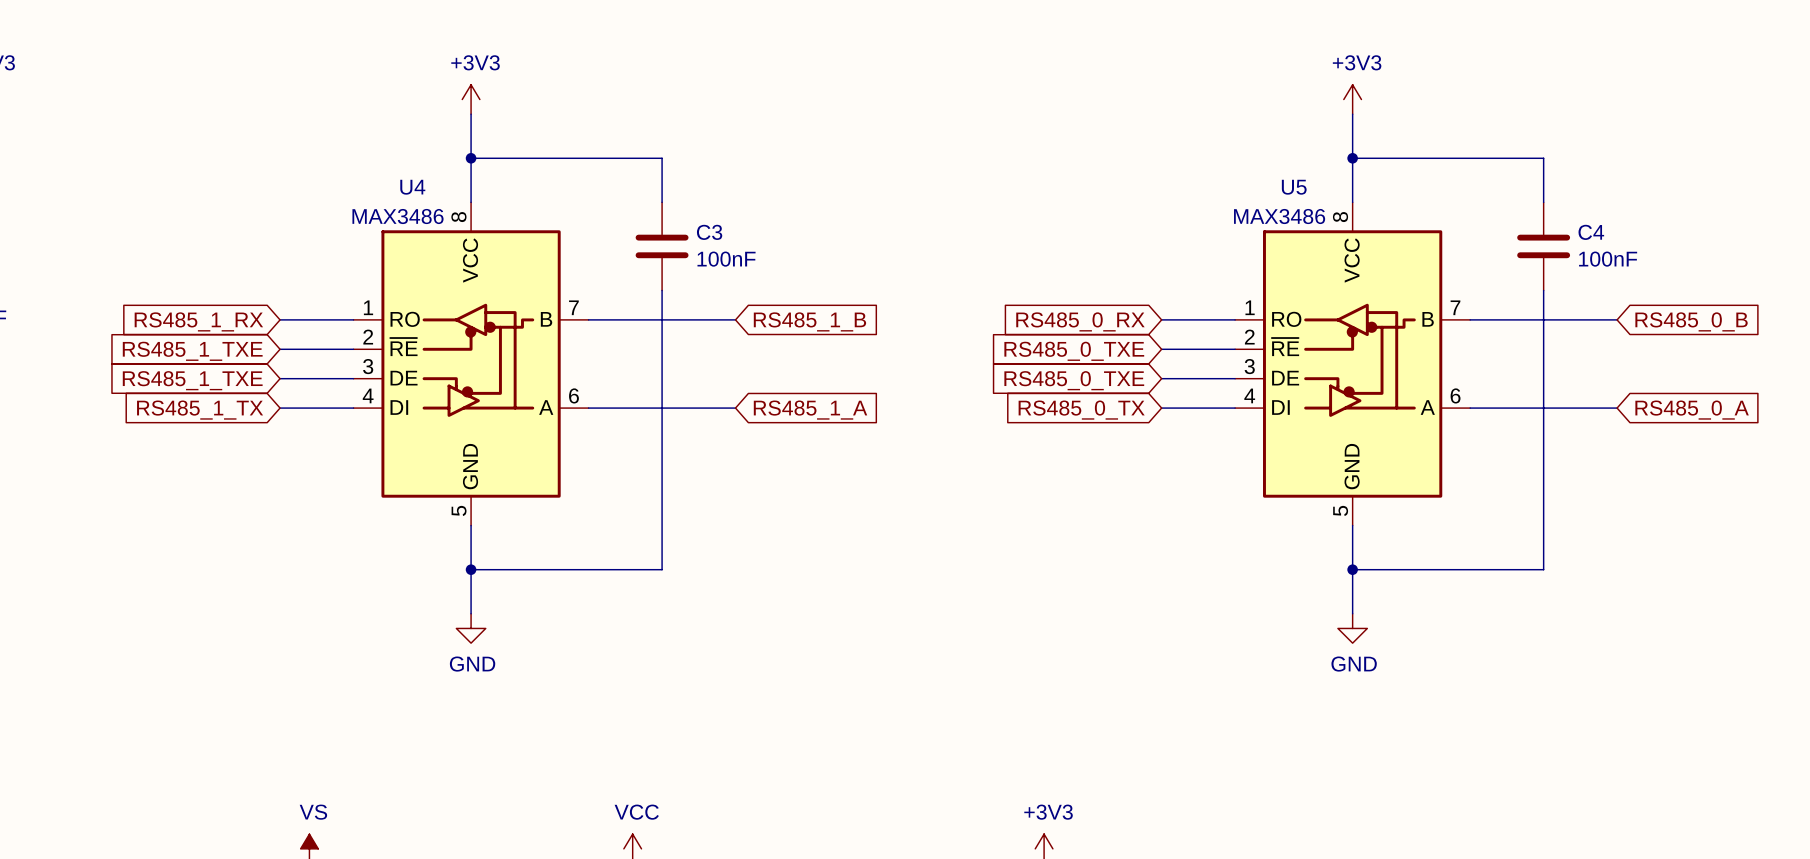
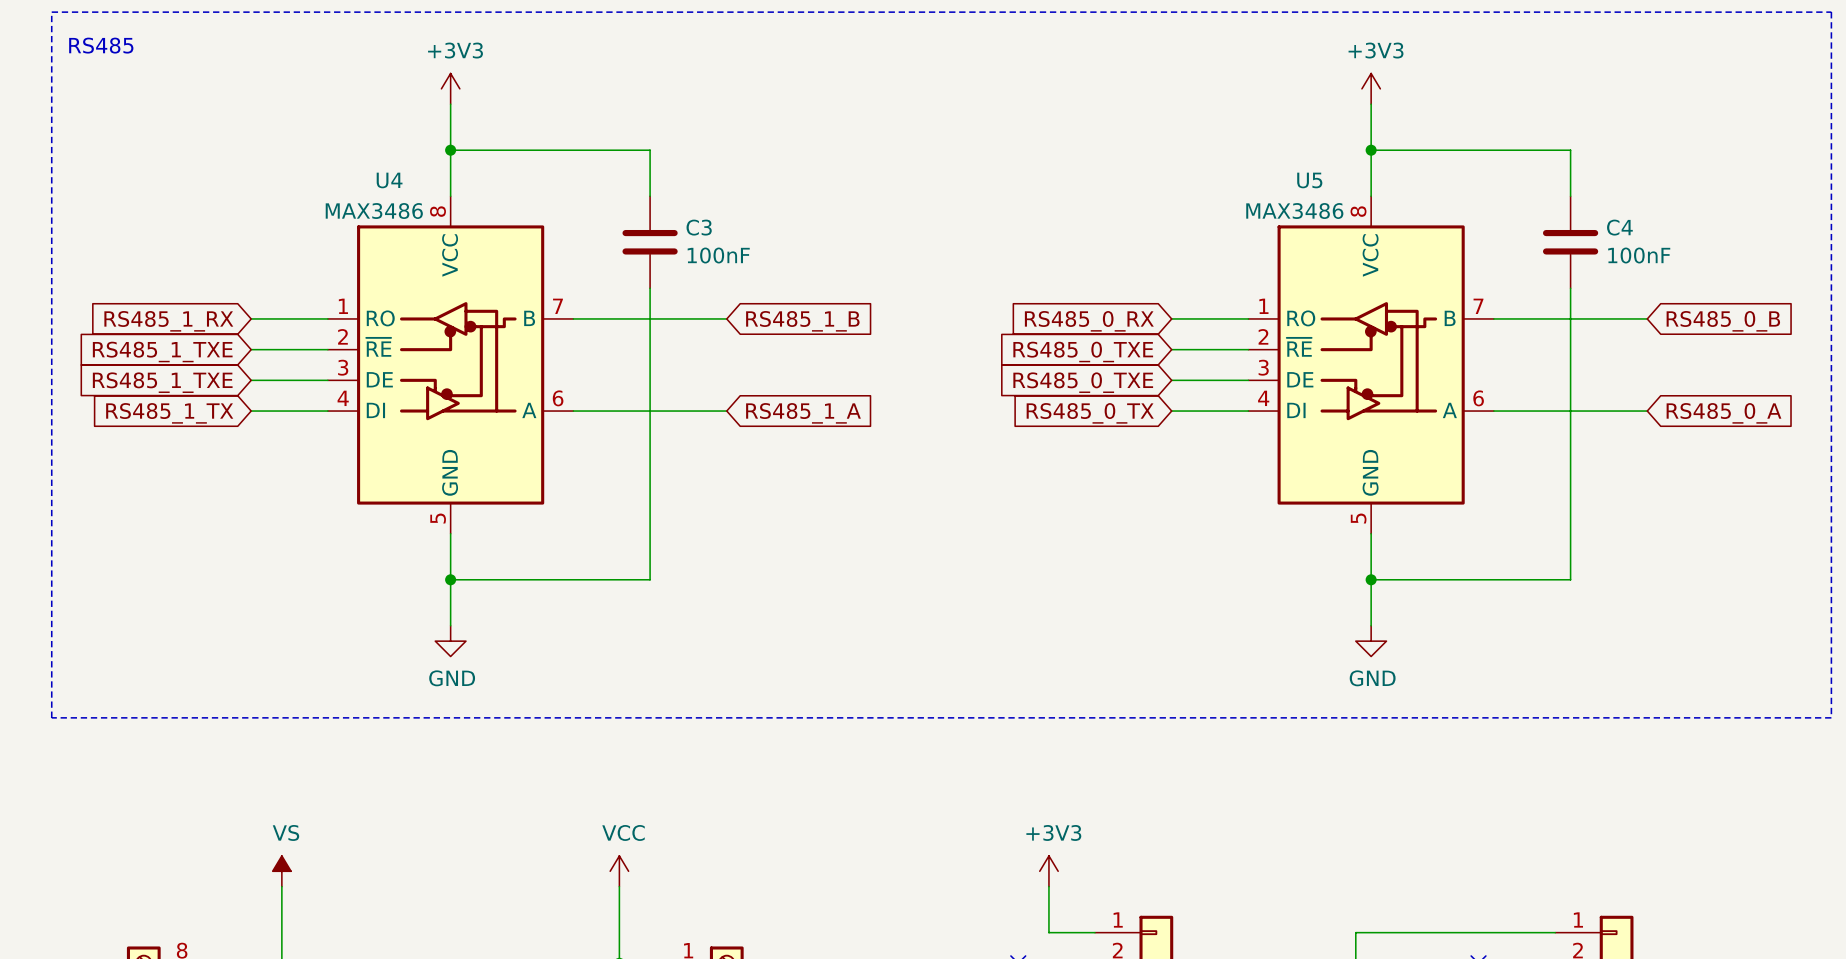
line: none -> (51, 12) (1831, 12) (1831, 717) (51, 717) (51, 12)
text: none -> RS485 (101, 45)

